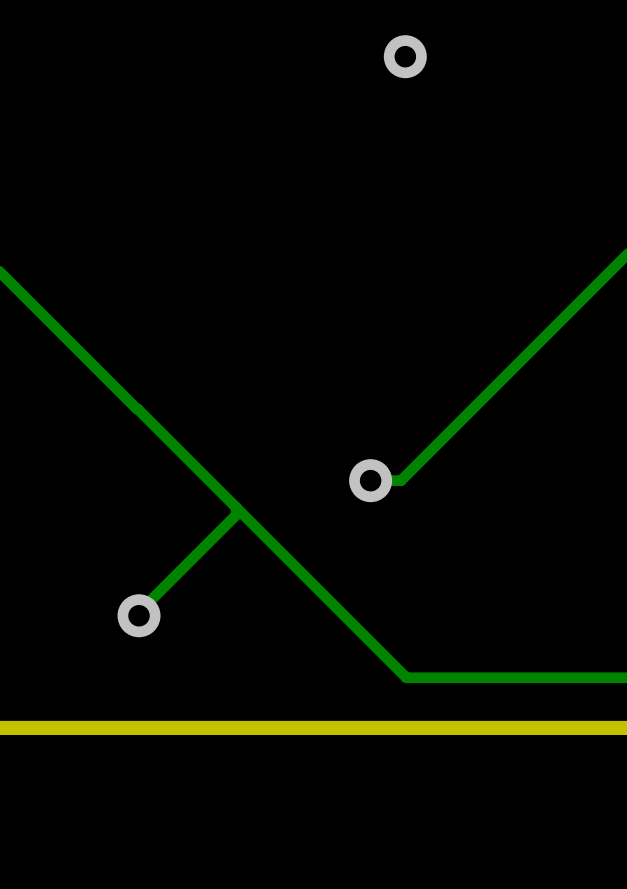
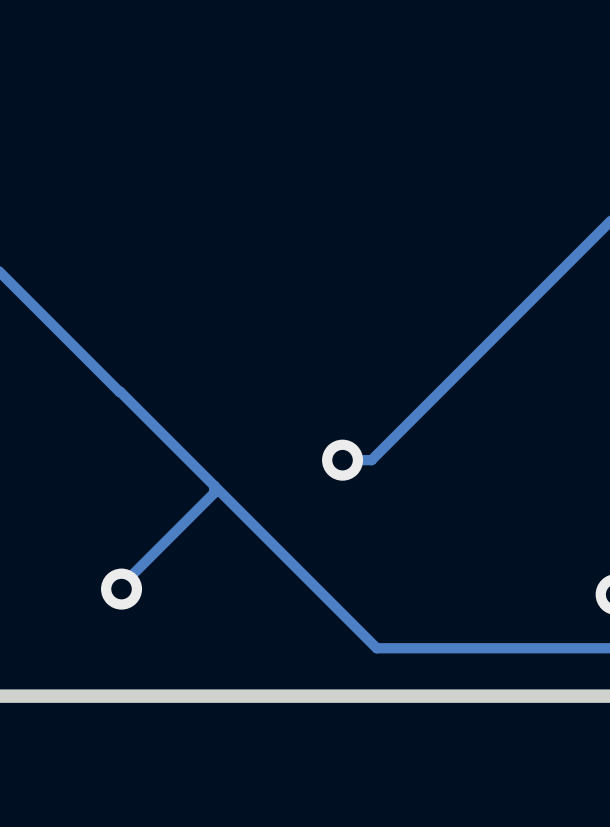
via: (405, 56) -> none

